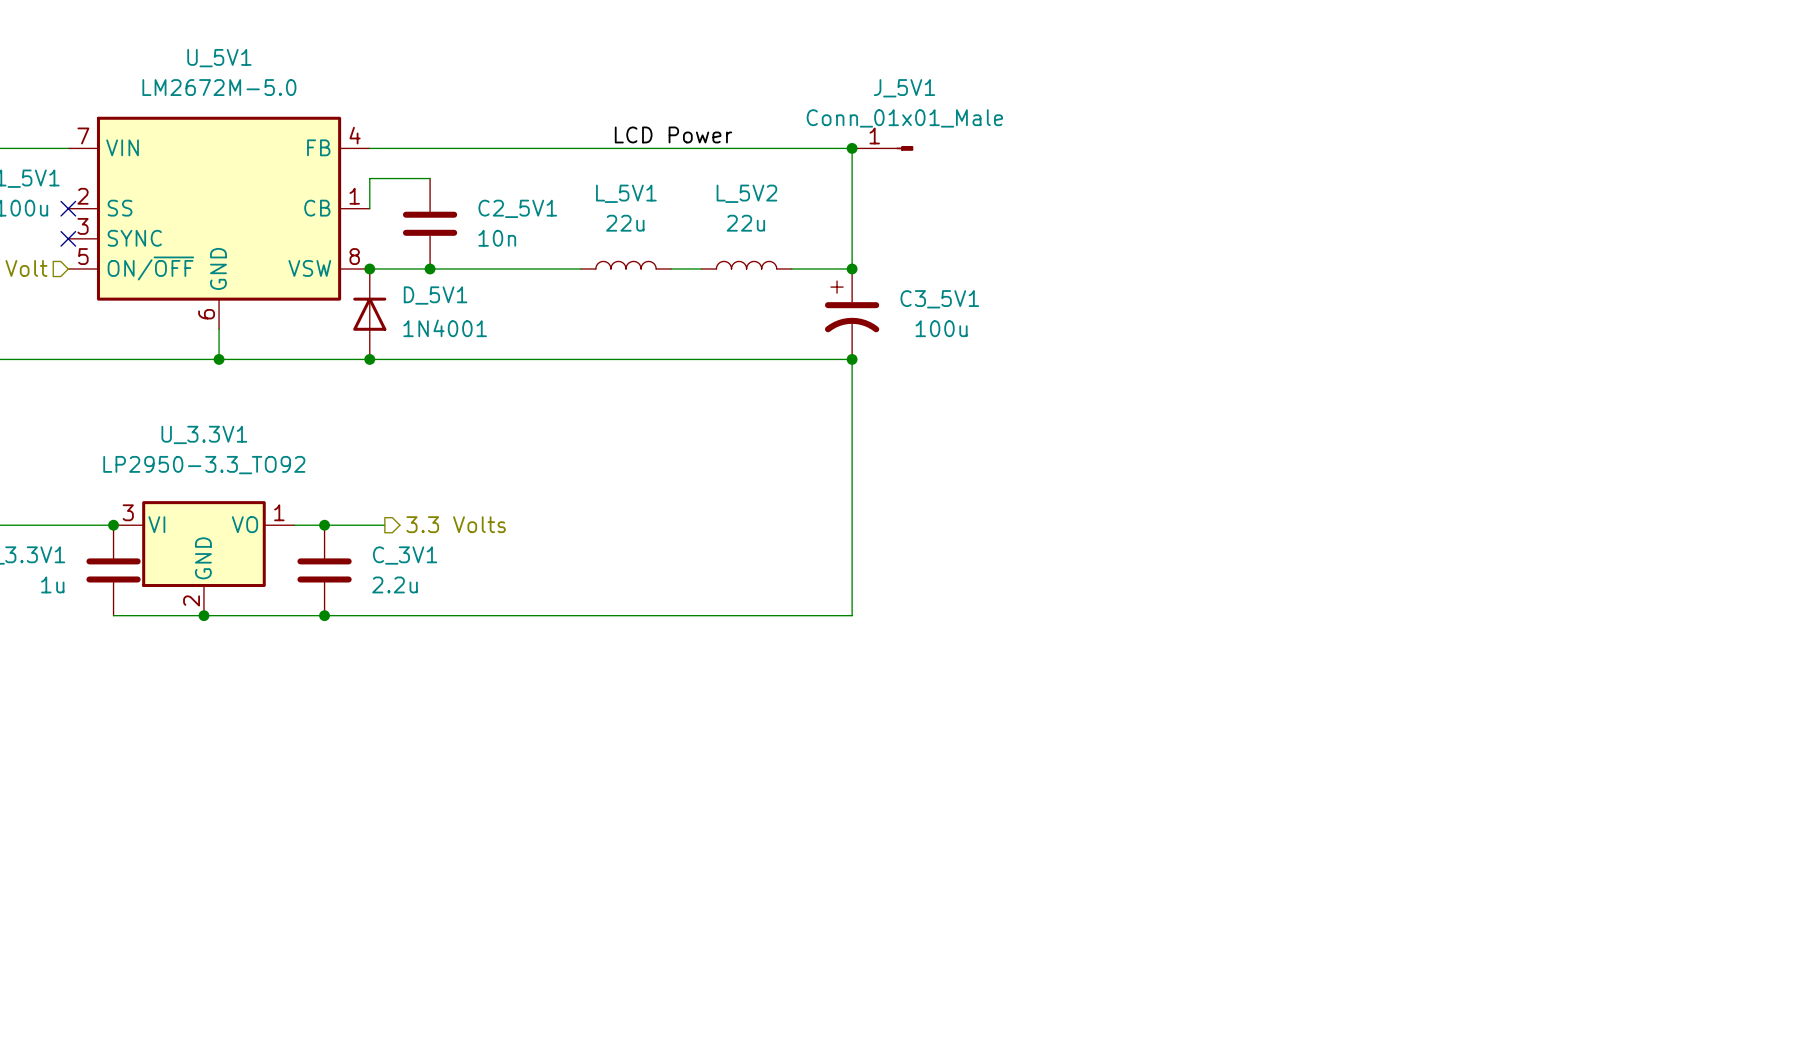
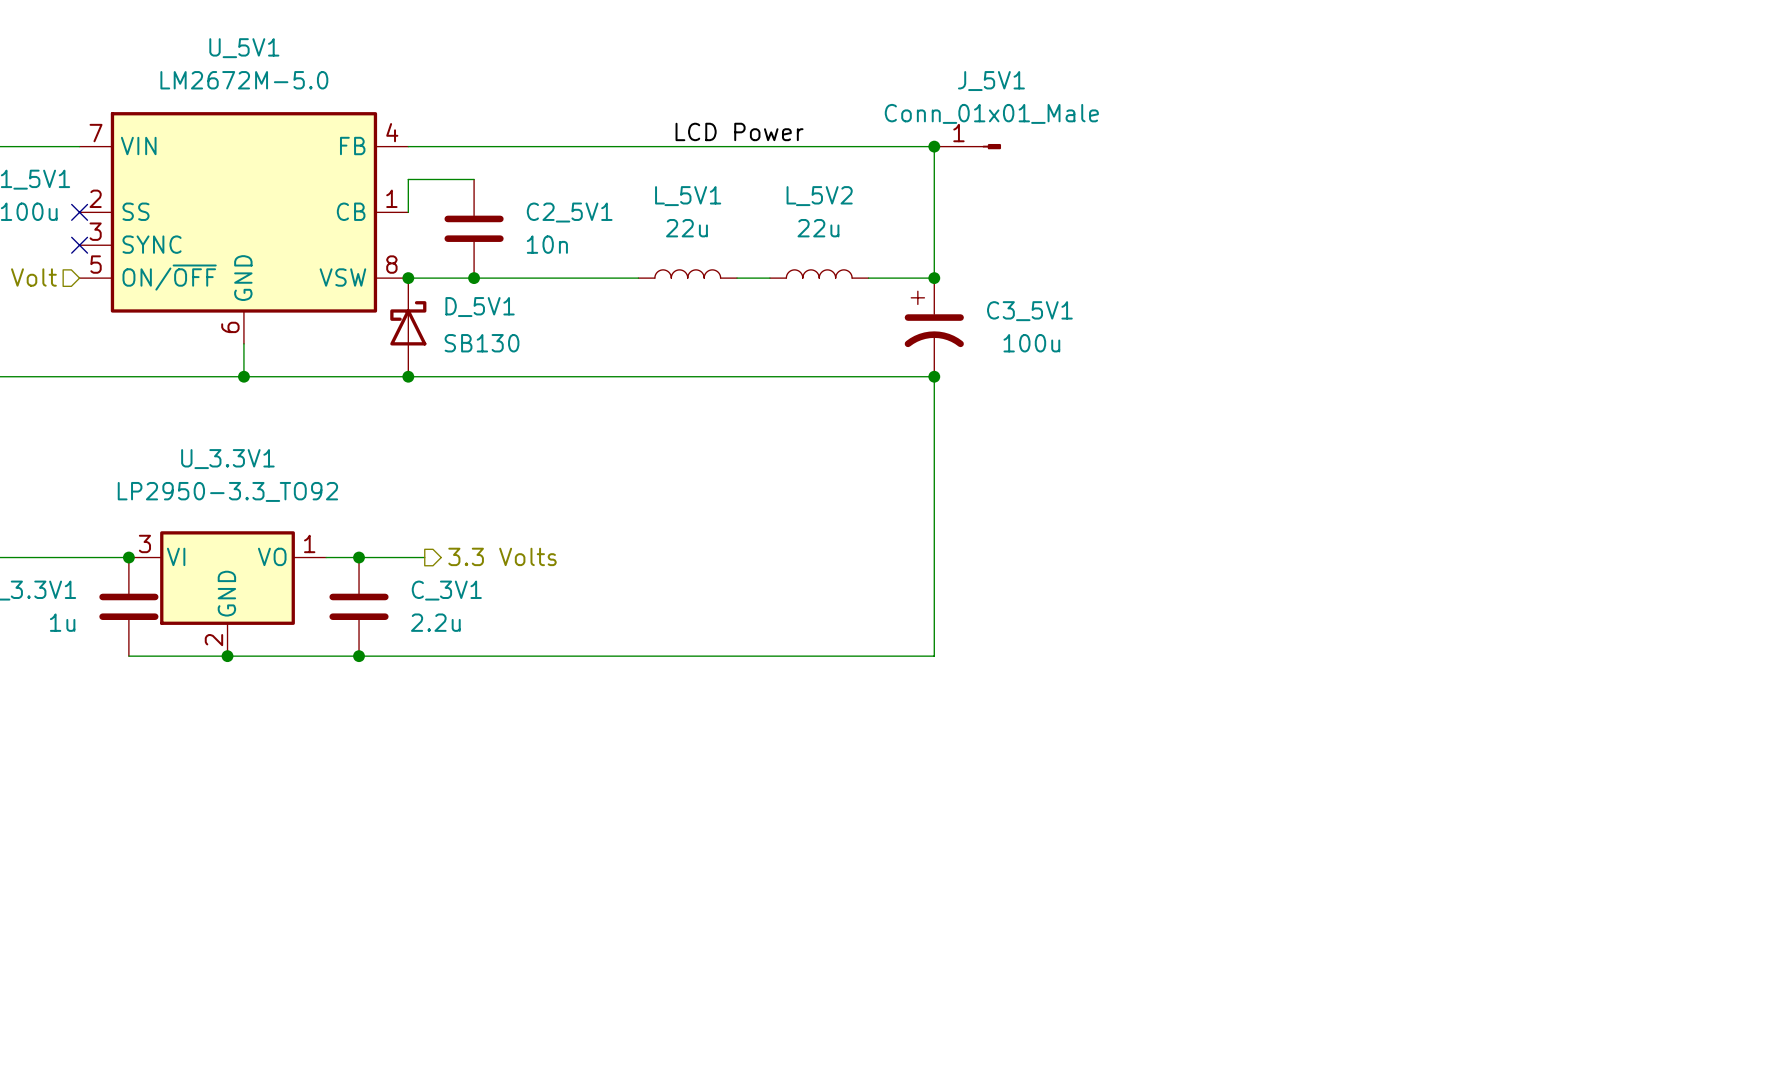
D_5V1 symbol: [353, 268, 387, 360] -> [390, 278, 427, 377]
D_5V1 value: 1N4001 (445, 328) -> SB130 (482, 343)

